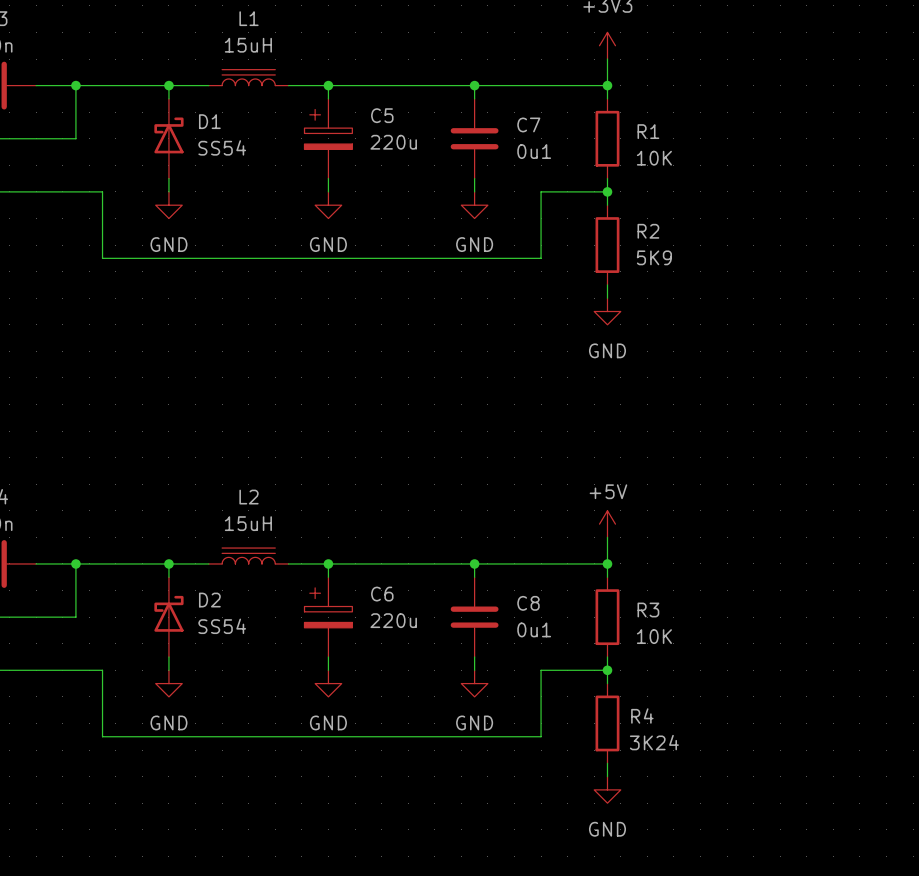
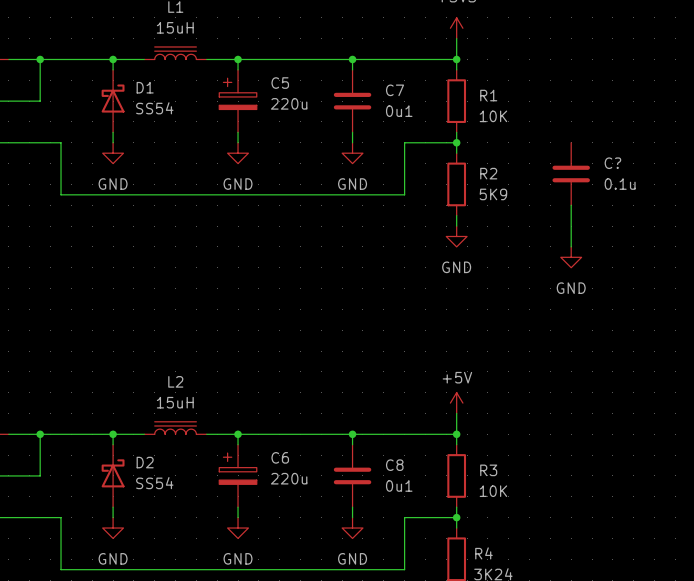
C?: none -> 0.1u (571, 174)
wire: none -> (571, 205) (571, 246)
power symbol: none -> GND (571, 257)

